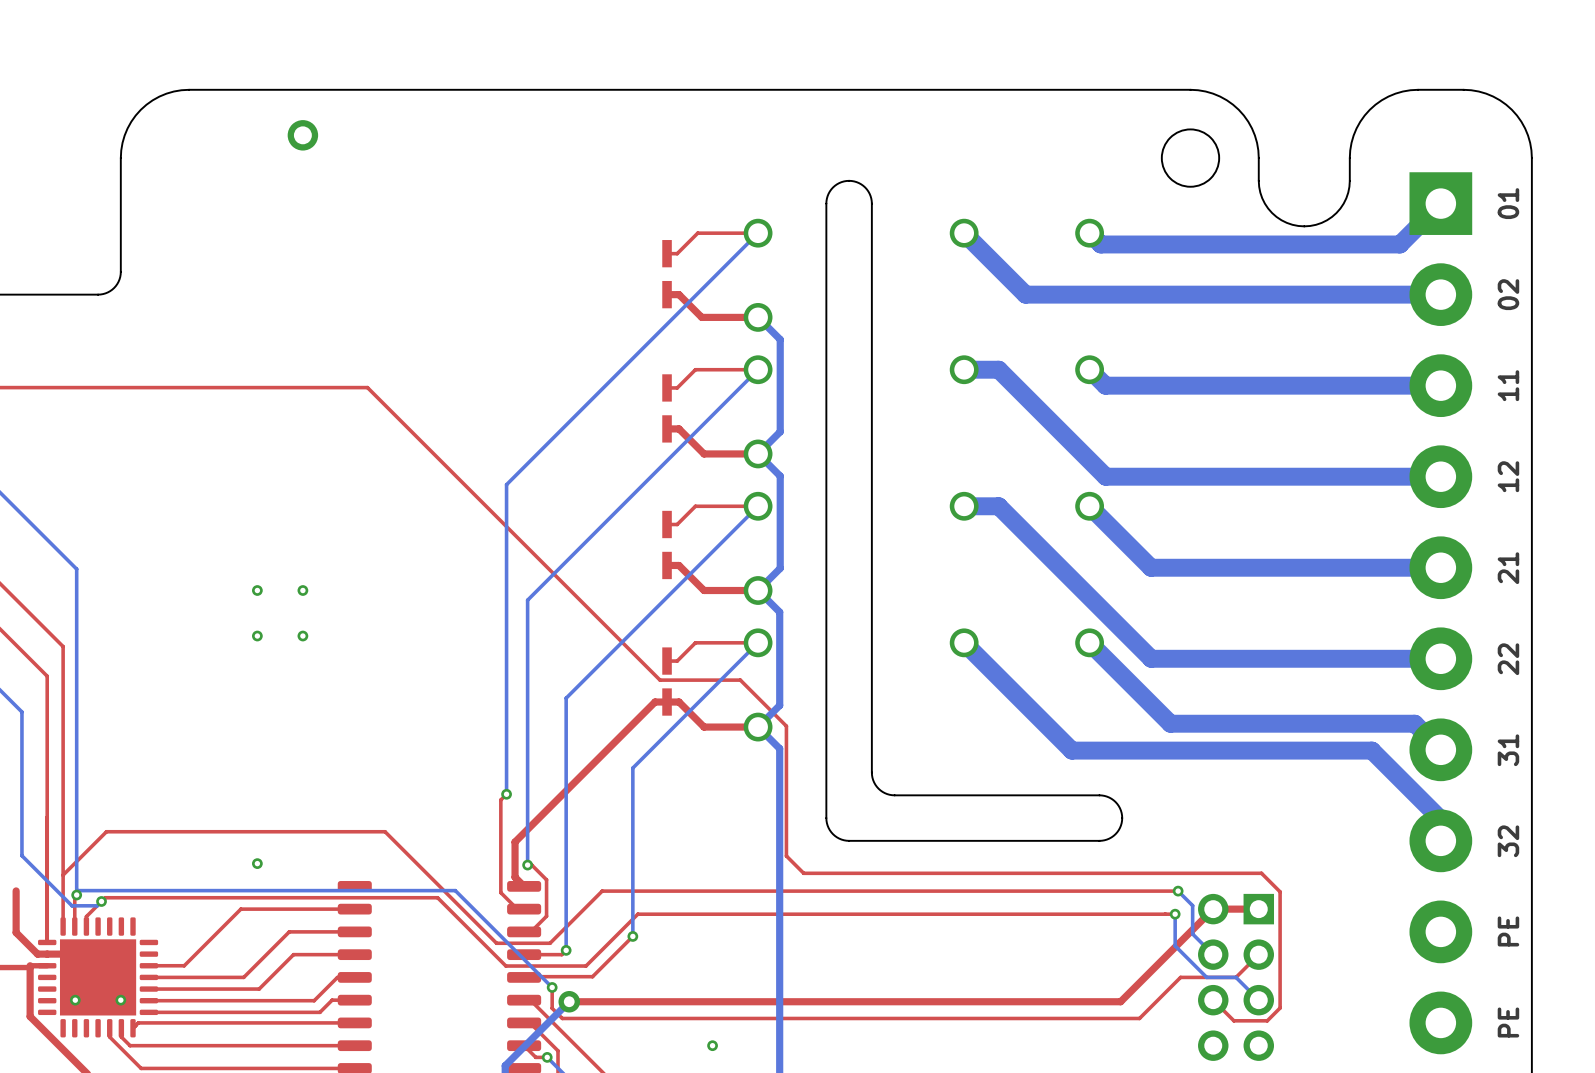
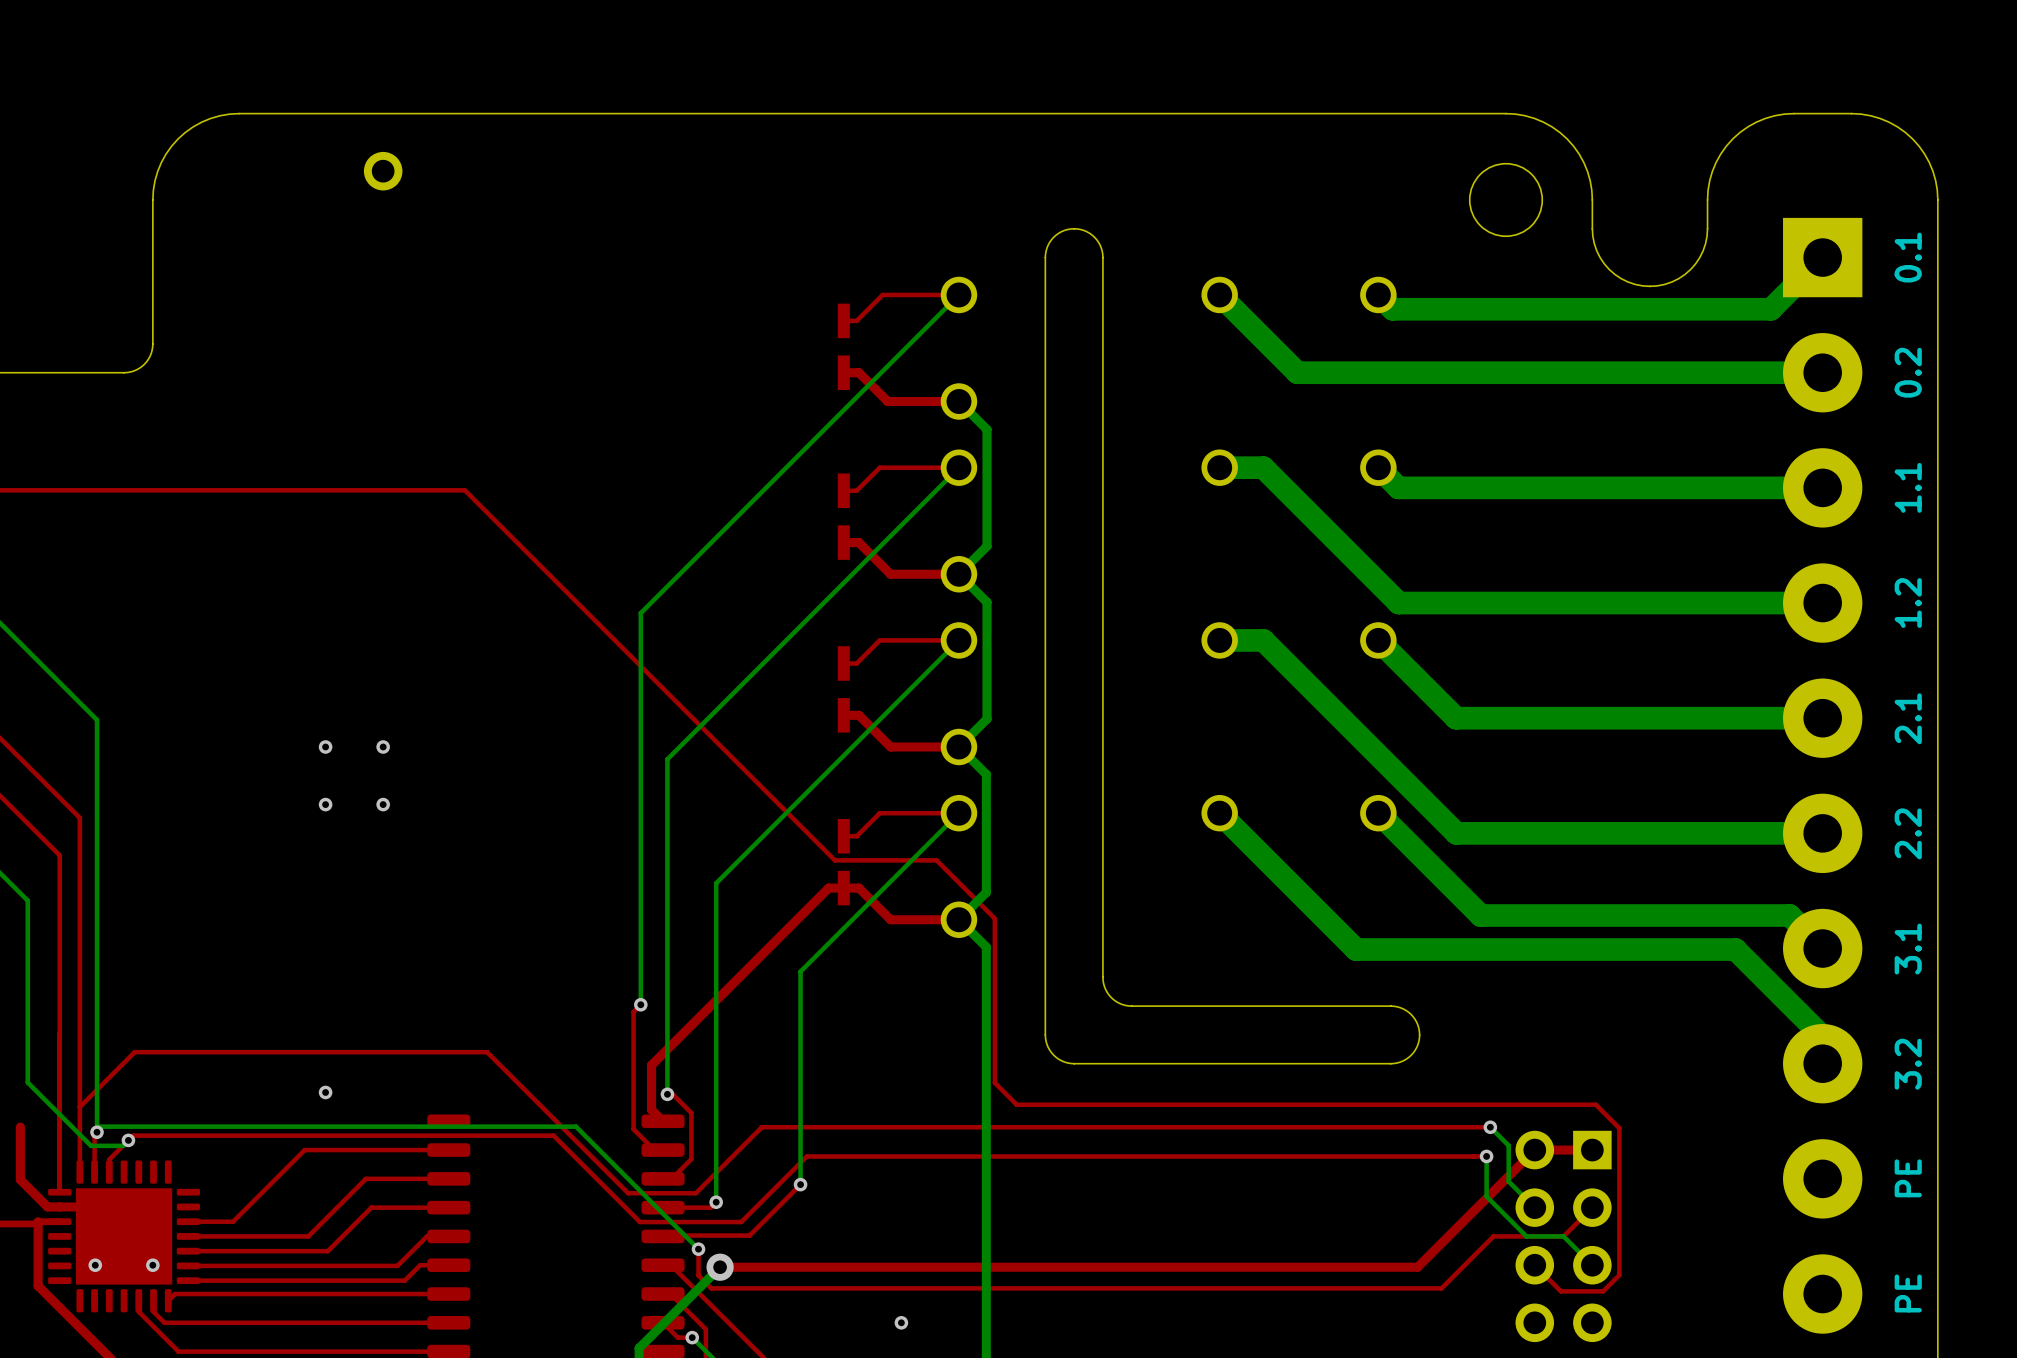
text: 01 (1508, 203) -> 0.1 (1908, 257)
text: 02 (1508, 294) -> 0.2 (1908, 372)
text: 11 (1508, 385) -> 1.1 (1908, 487)
text: 12 (1508, 476) -> 1.2 (1908, 603)
text: 21 (1508, 568) -> 2.1 (1908, 718)
text: 22 (1508, 659) -> 2.2 (1908, 833)
text: 31 (1508, 750) -> 3.1 (1908, 949)
text: 32 (1508, 841) -> 3.2 (1908, 1064)

